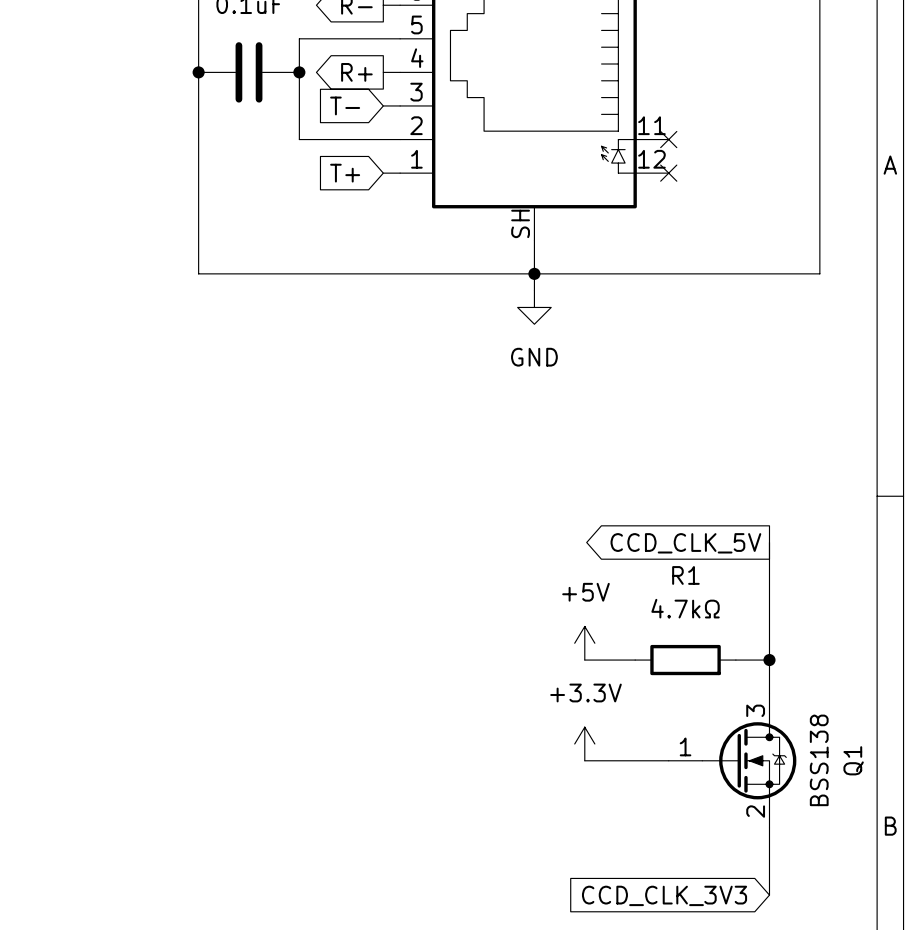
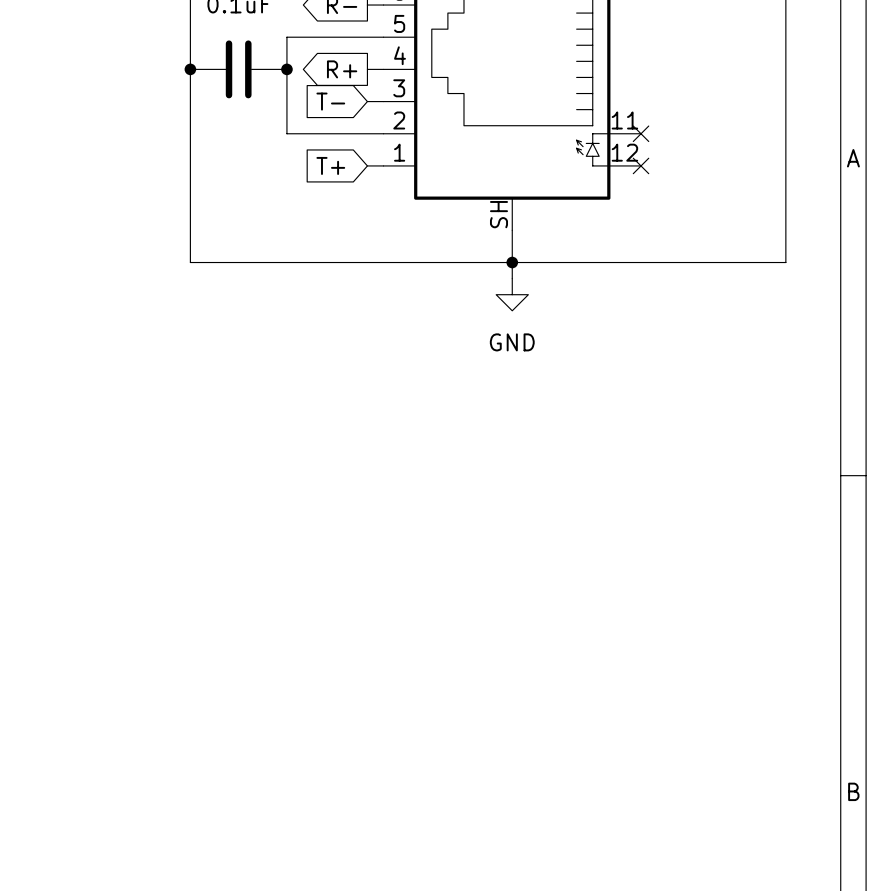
wire: (769, 542) (769, 693) -> none
global label: CCD_CLK_5V (685, 543) -> none
power symbol: +5V (584, 643) -> none
wire: (584, 660) (635, 660) -> none
R1: 4.7kΩ (685, 660) -> none
wire: (735, 660) (769, 660) -> none
junction: (769, 660) -> none
power symbol: +3.3V (584, 743) -> none
wire: (584, 760) (668, 760) -> none
Q1: BSS138 (732, 760) -> none
wire: (769, 827) (769, 895) -> none
global label: CCD_CLK_3V3 (664, 895) -> none

